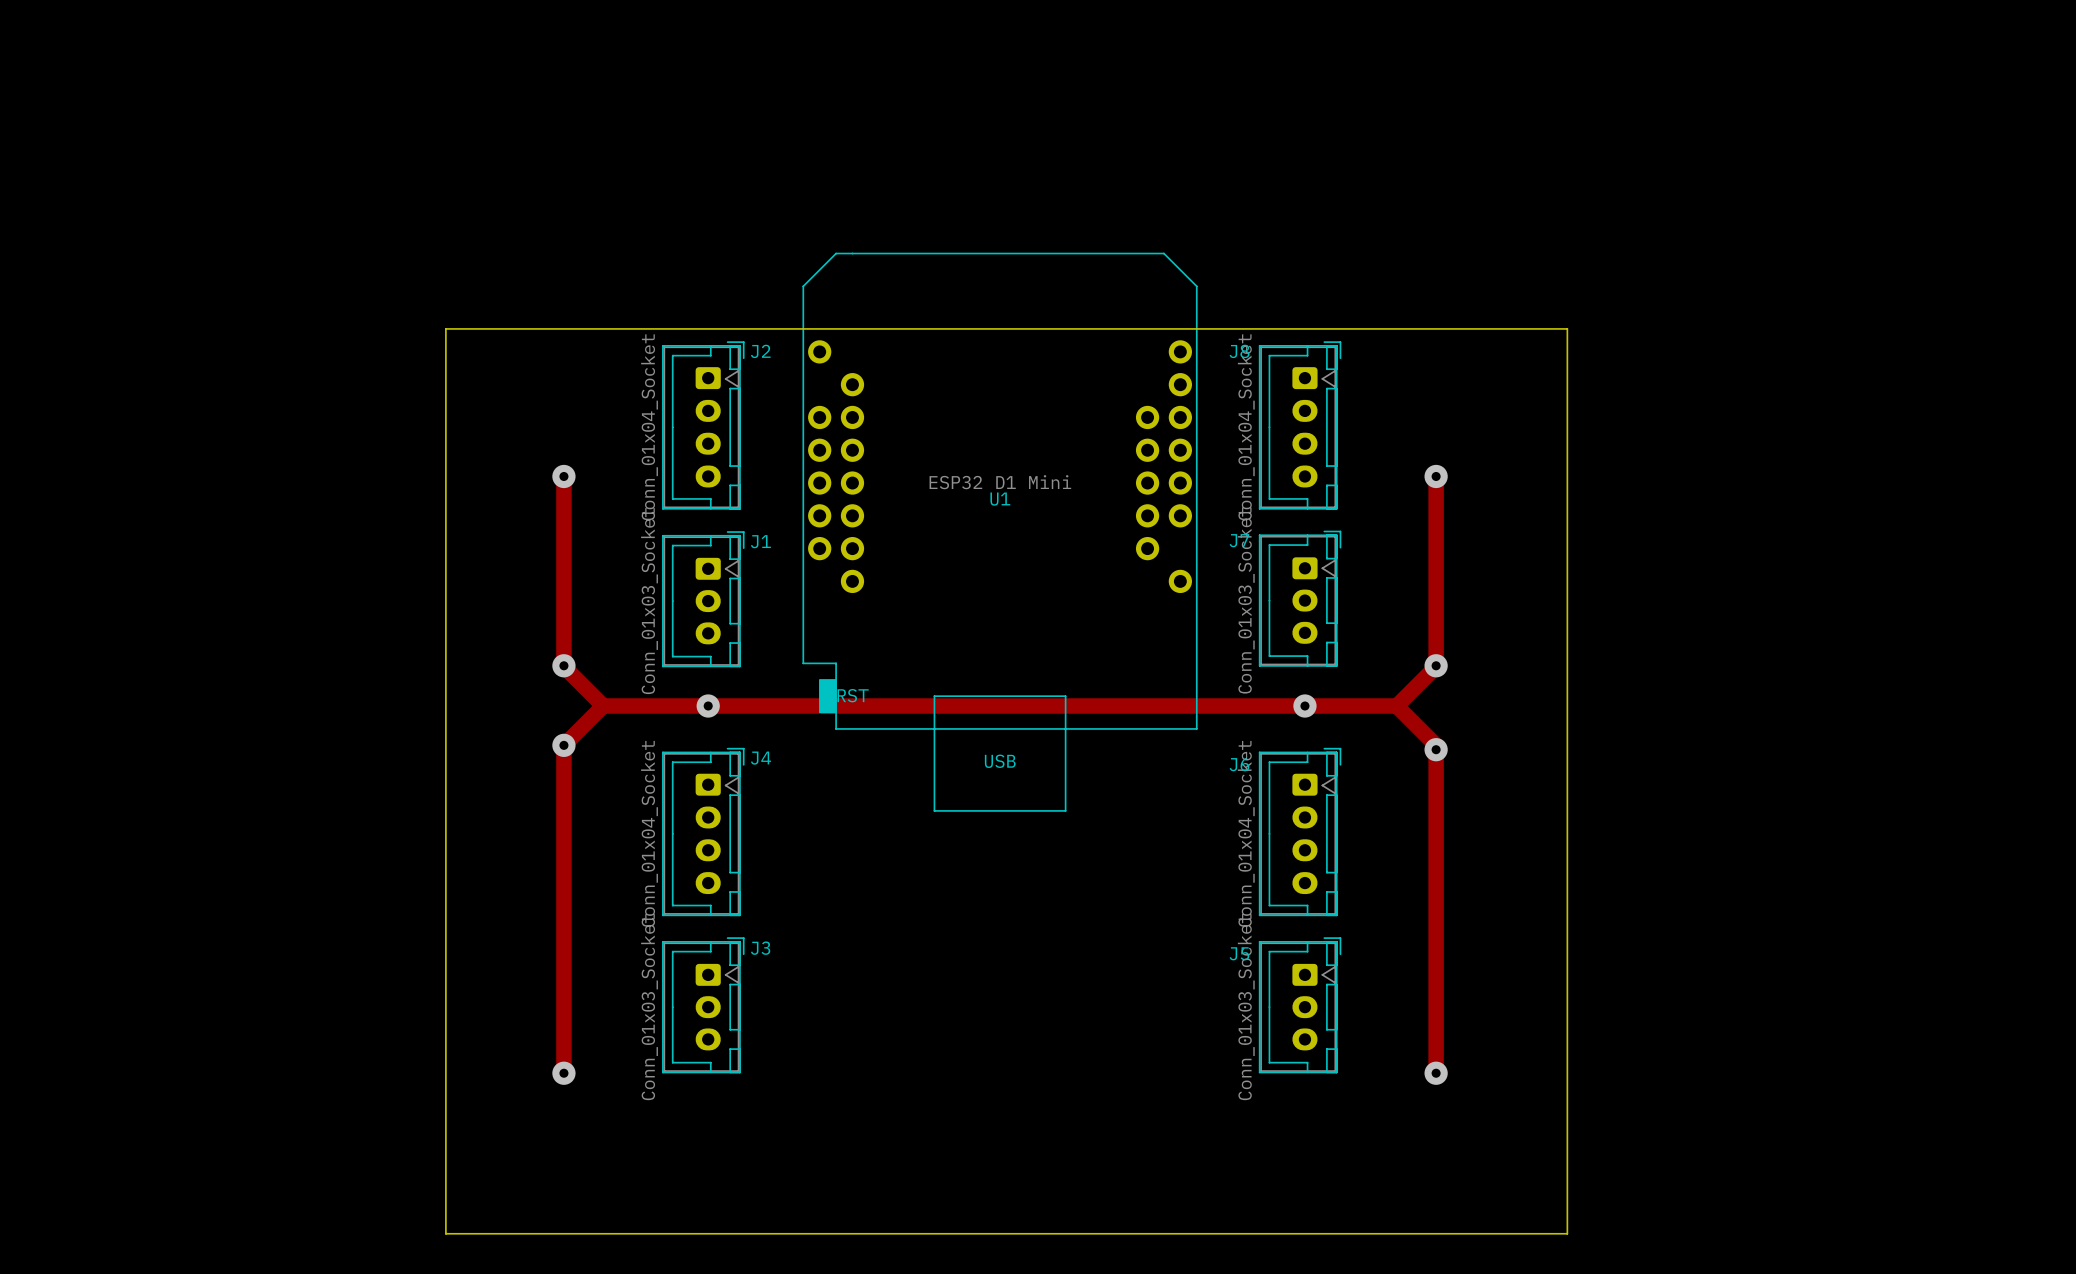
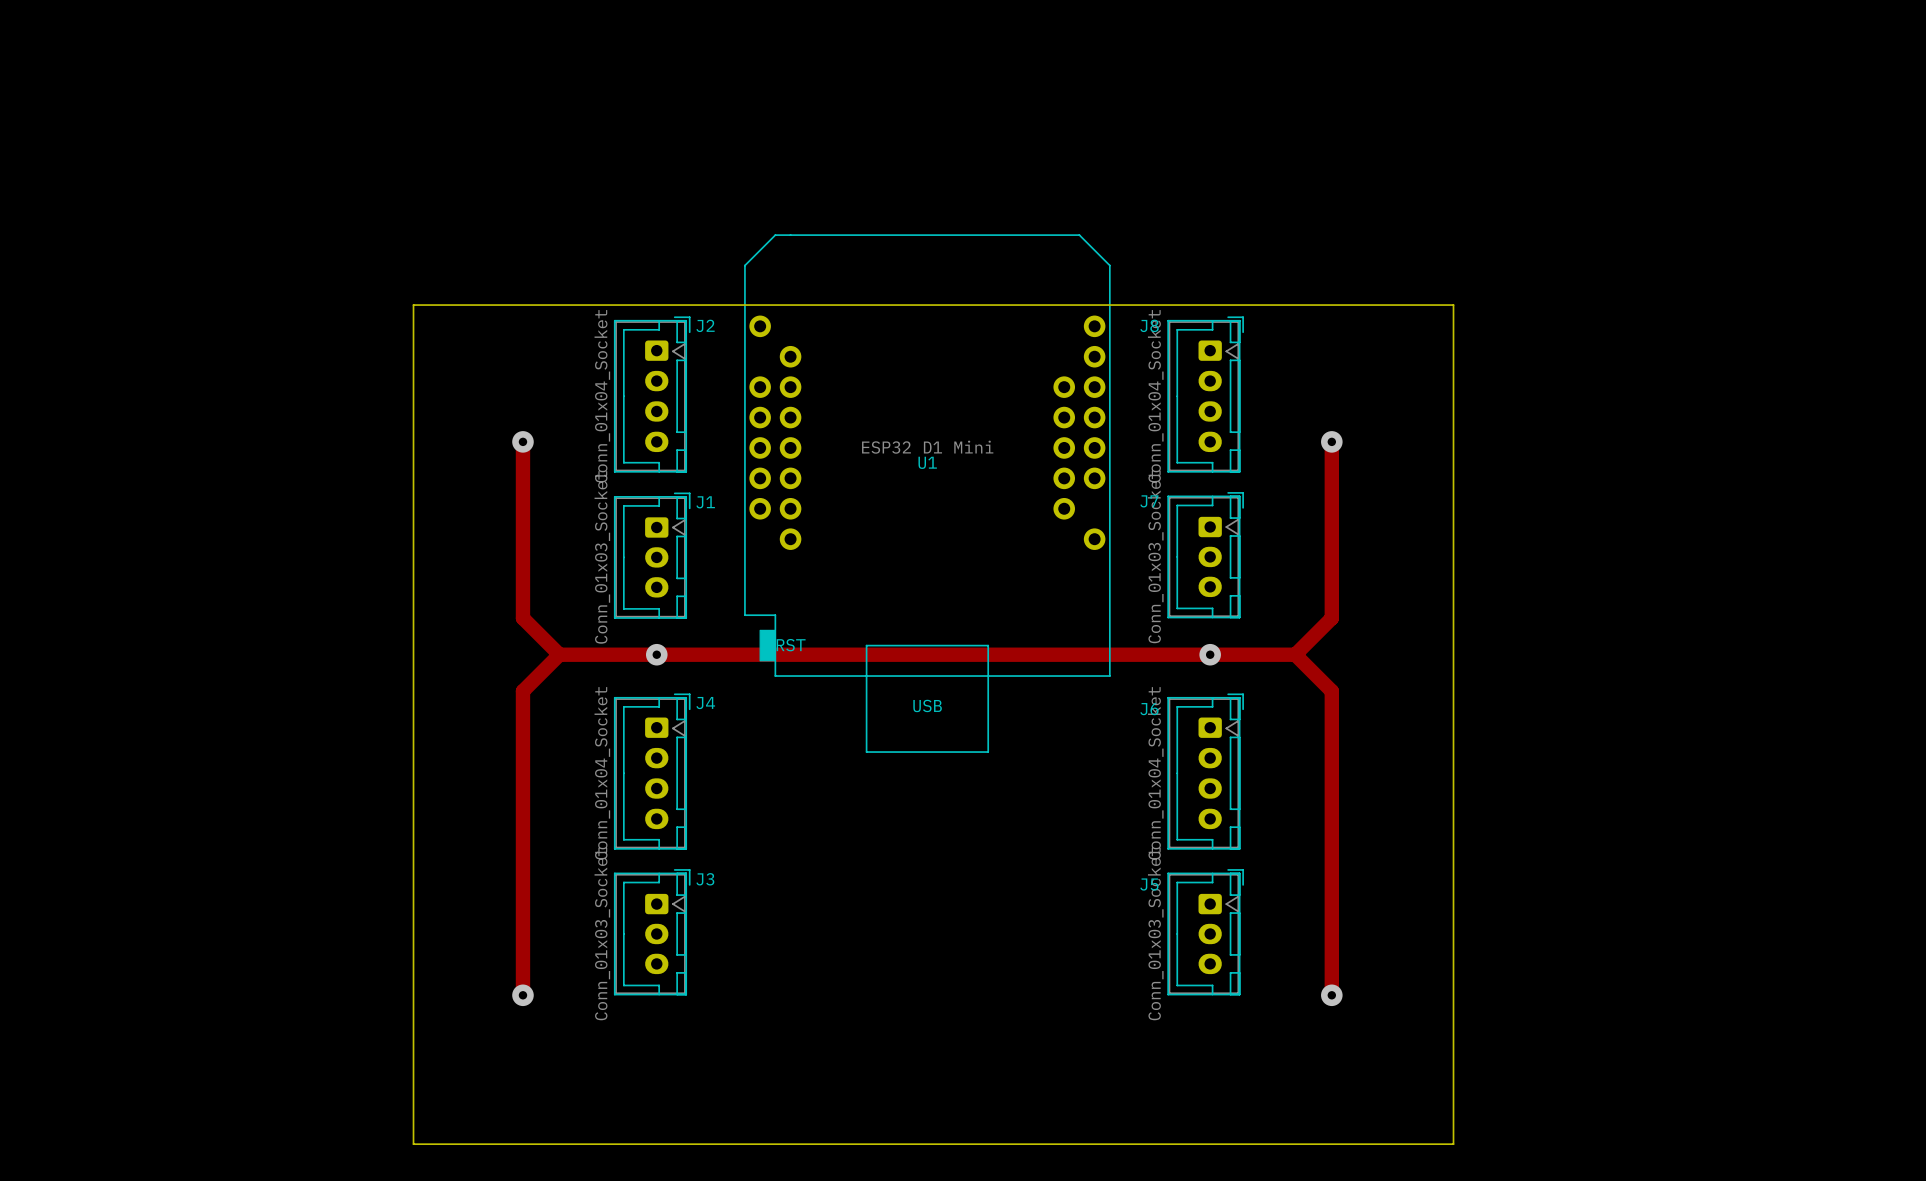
via: (563, 665) -> none
via: (1436, 665) -> none
via: (563, 745) -> none
via: (1436, 749) -> none

